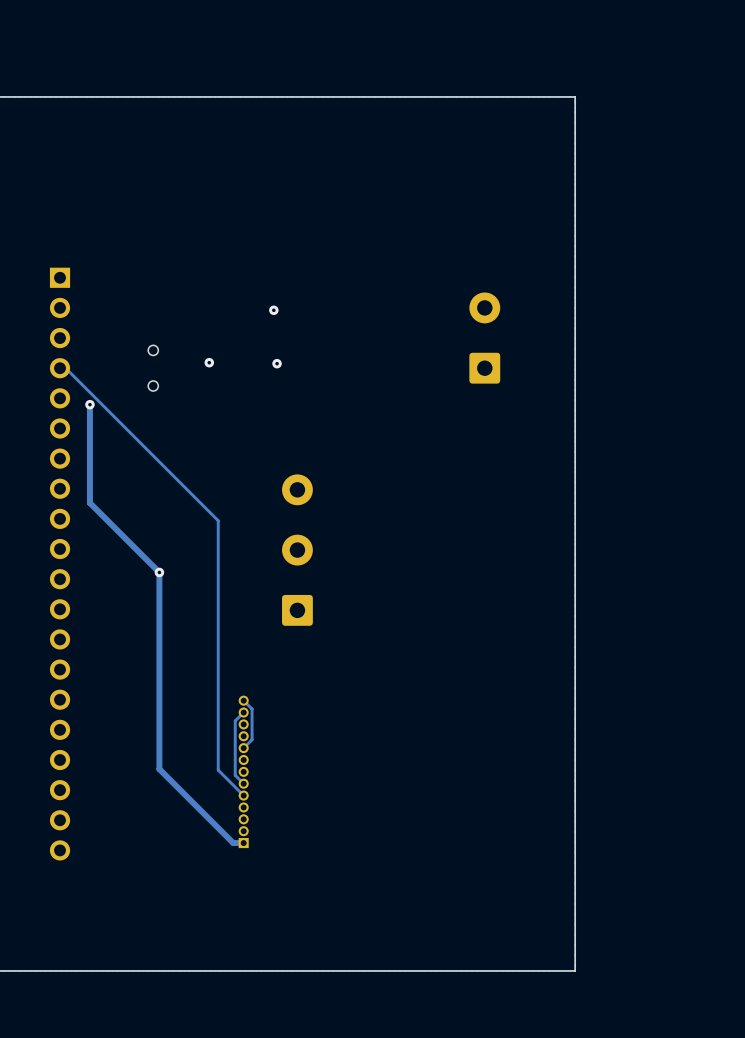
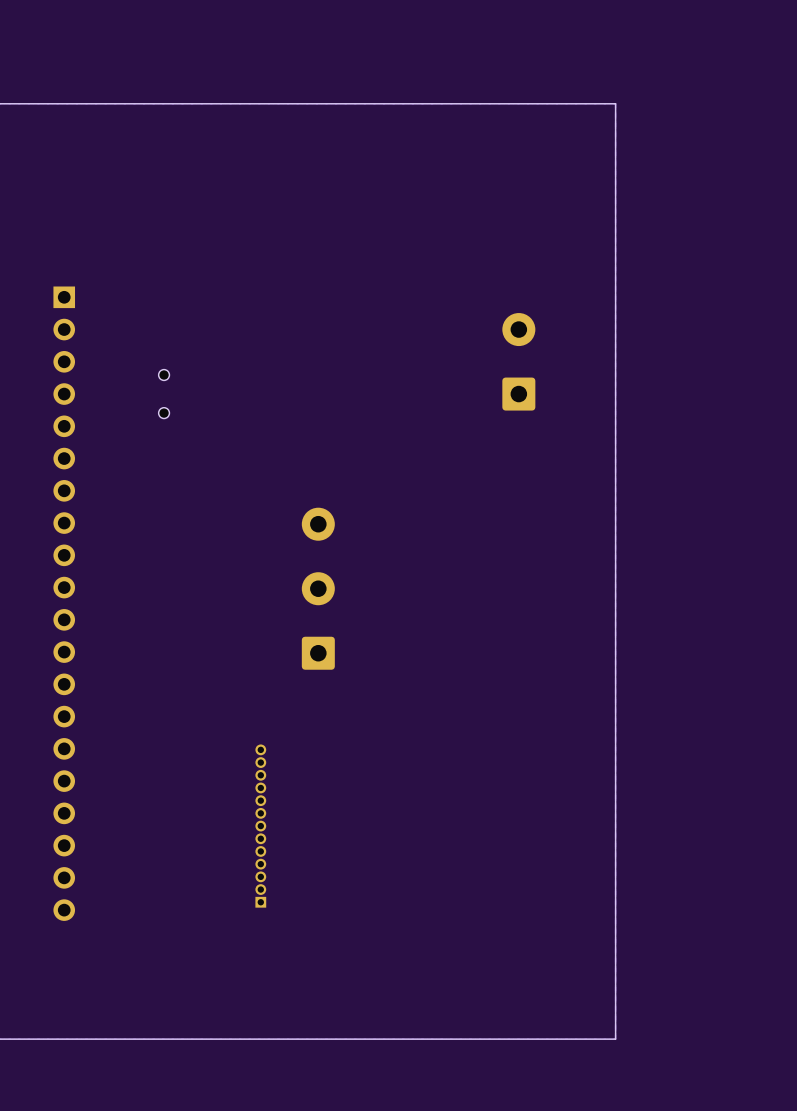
via: (273, 310) -> none
via: (209, 362) -> none
via: (277, 363) -> none
track: (60, 368) (65, 368) (218, 520) (218, 770) (243, 795) -> none
track: (89, 404) (89, 503) (159, 572) (159, 769) (233, 843) (243, 843) -> none
via: (89, 404) -> none
via: (159, 572) -> none
track: (243, 700) (252, 709) (252, 739) (243, 748) -> none
track: (243, 712) (235, 720) (235, 775) (243, 783) -> none

